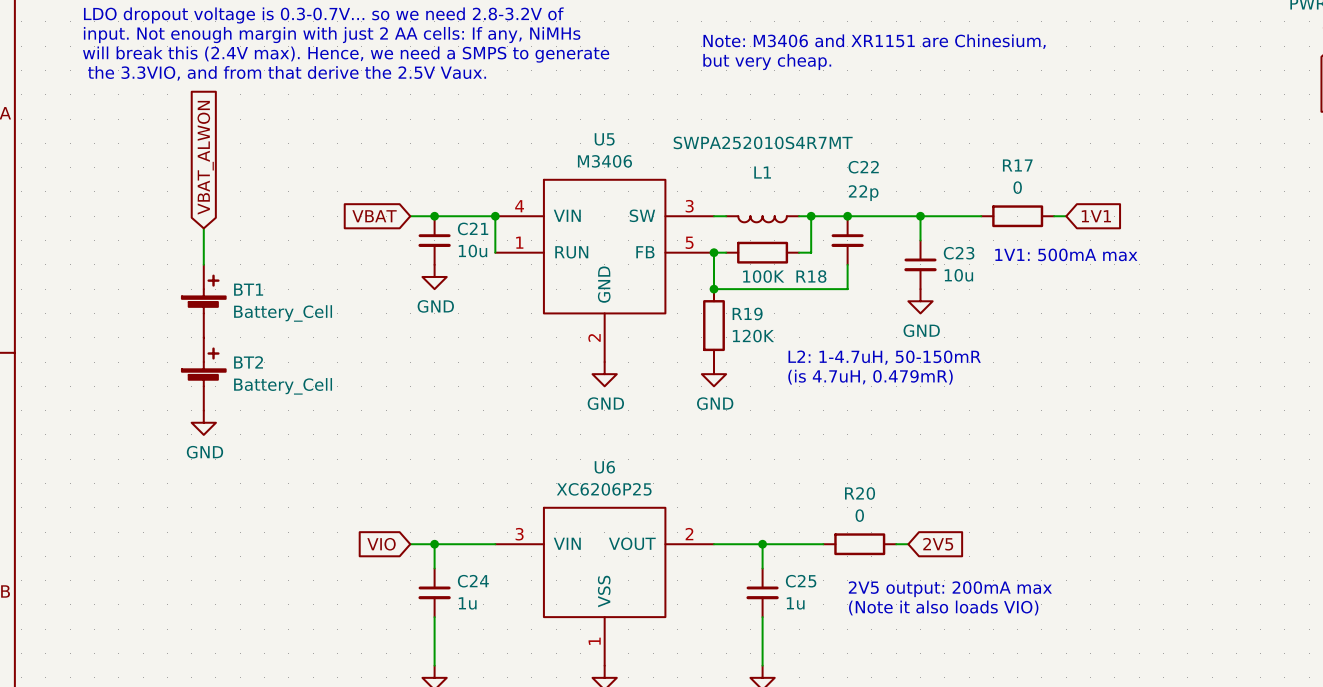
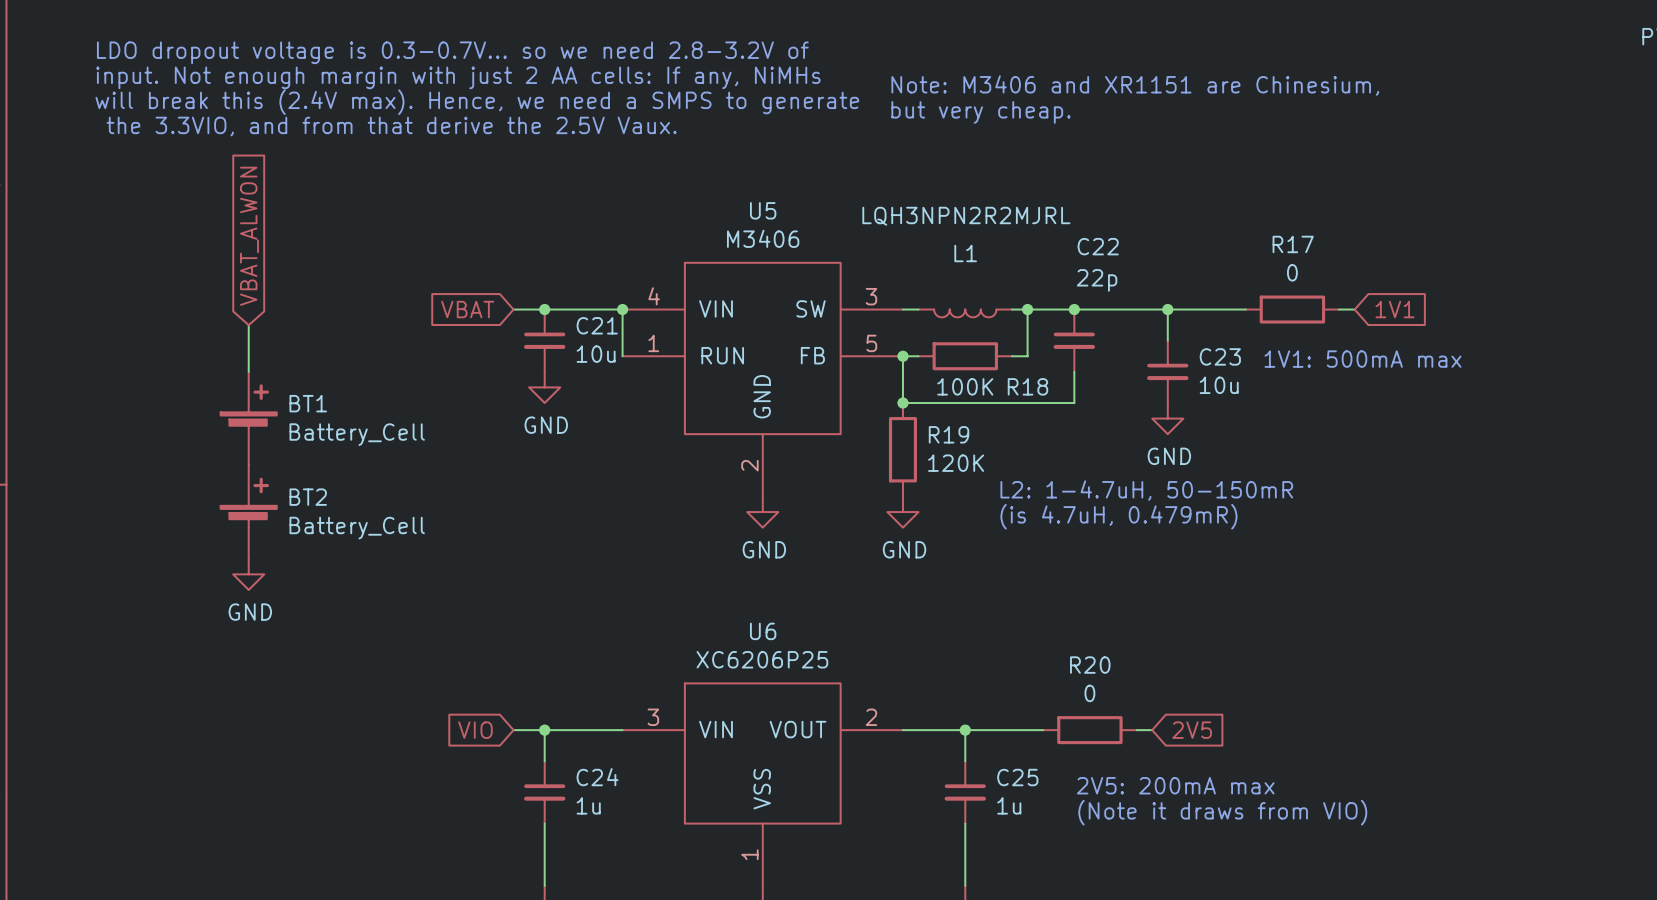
L1 value: SWPA252010S4R7MT (763, 142) -> LQH3NPN2R2MJRL (966, 216)
text: 2V5 output: 200mA max (950, 589) -> 2V5: 200mA max (1175, 785)
text: (Note it also loads VIO) (943, 608) -> (Note it draws from VIO) (1222, 812)

